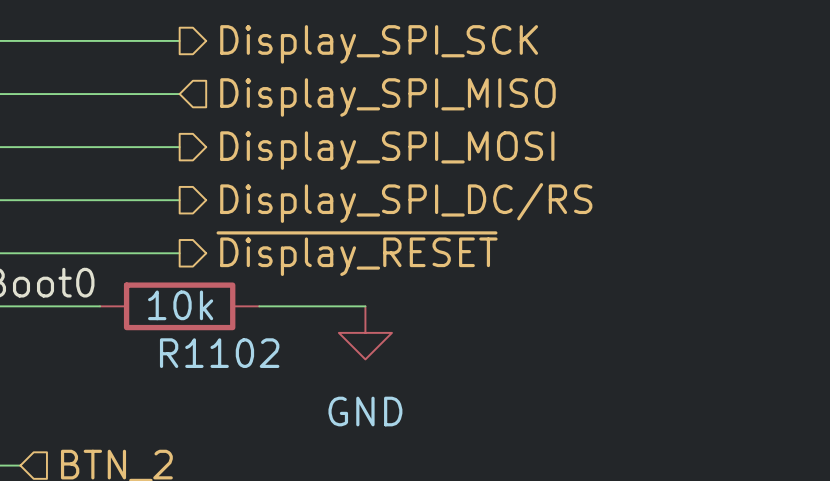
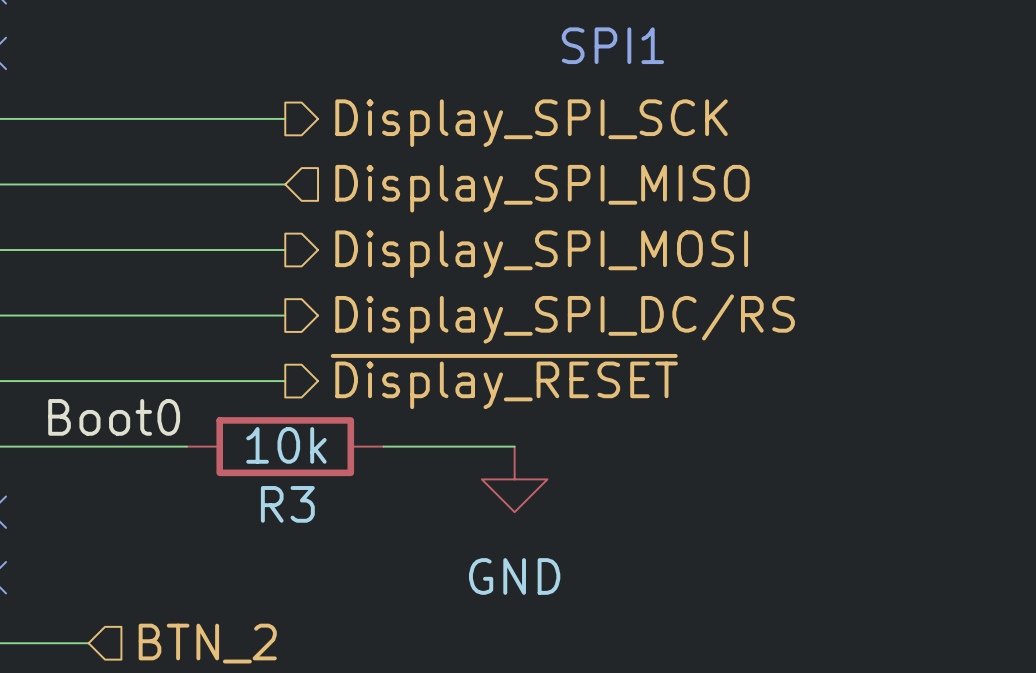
R1102 name: R1102 (219, 353) -> R3 (287, 504)

